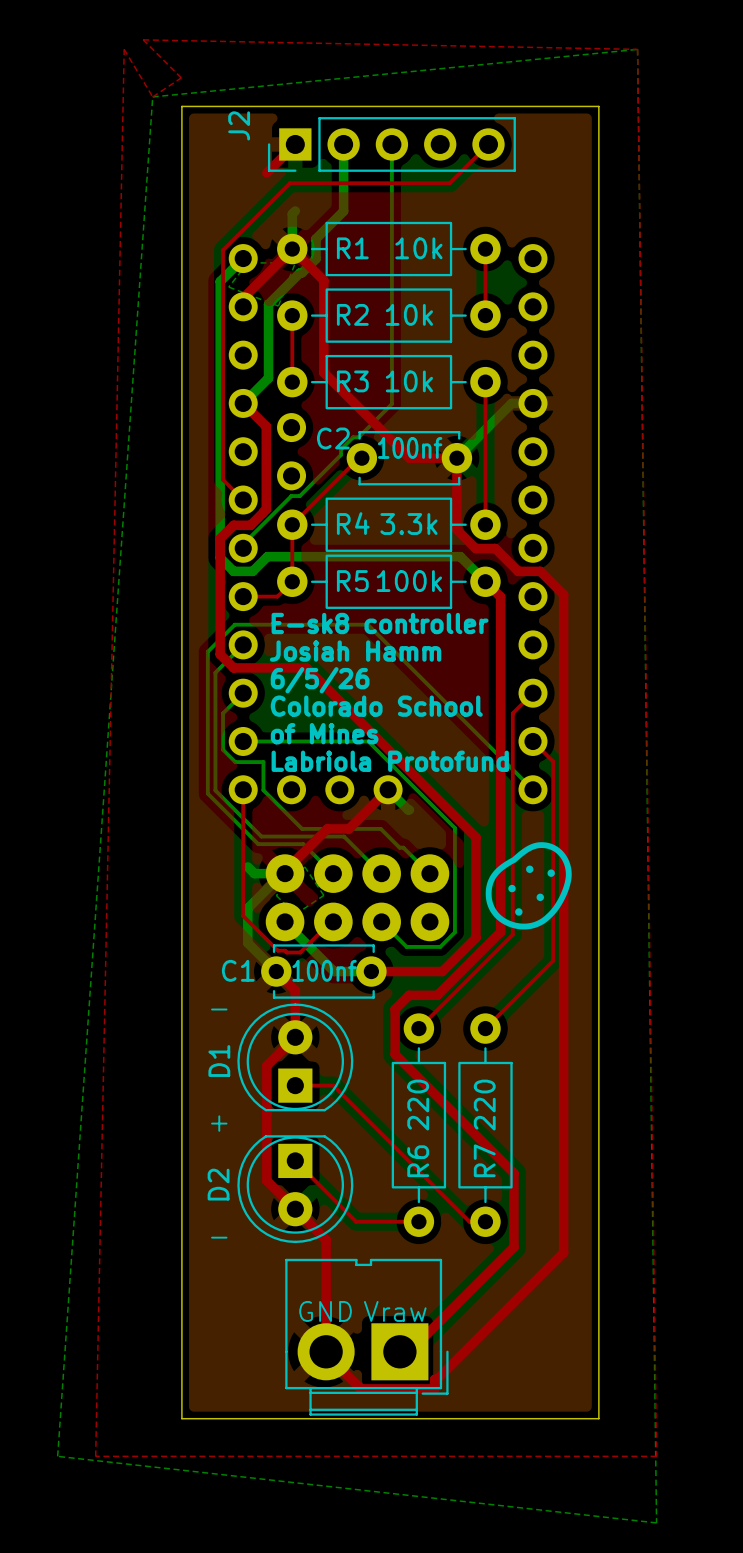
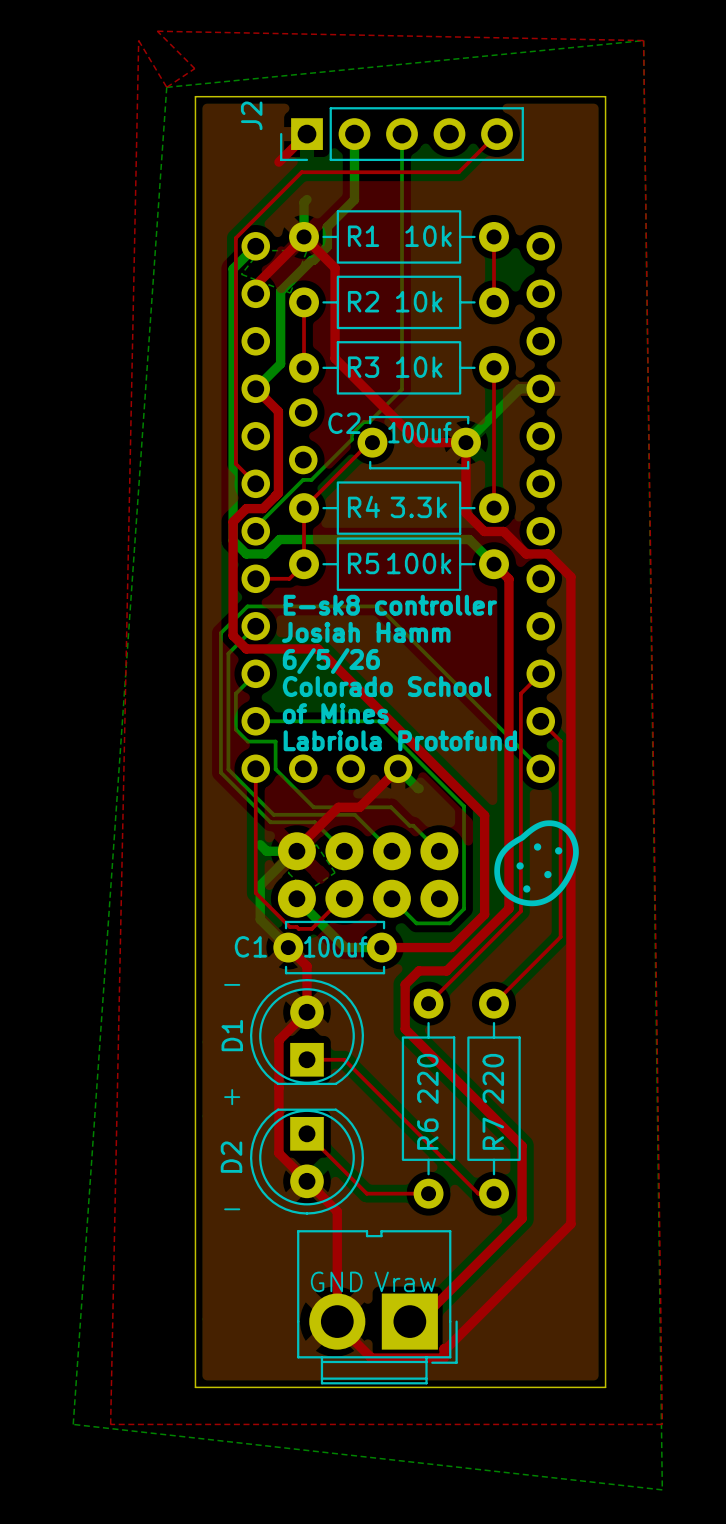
C2 value: 100nf (410, 447) -> 100uf (419, 432)
C1 value: 100nf (324, 970) -> 100uf (335, 946)

